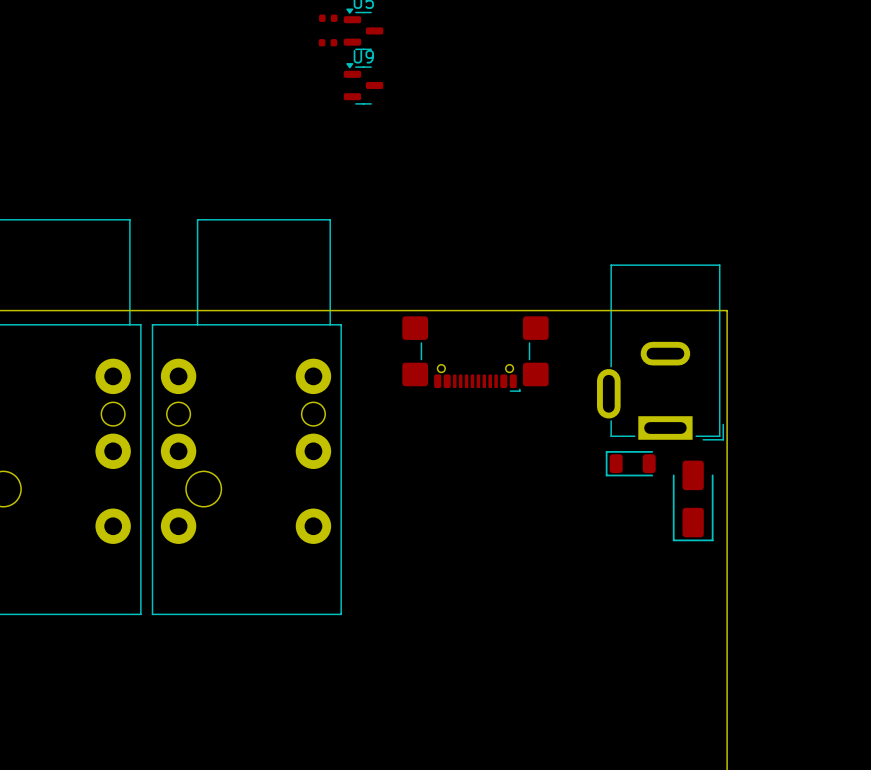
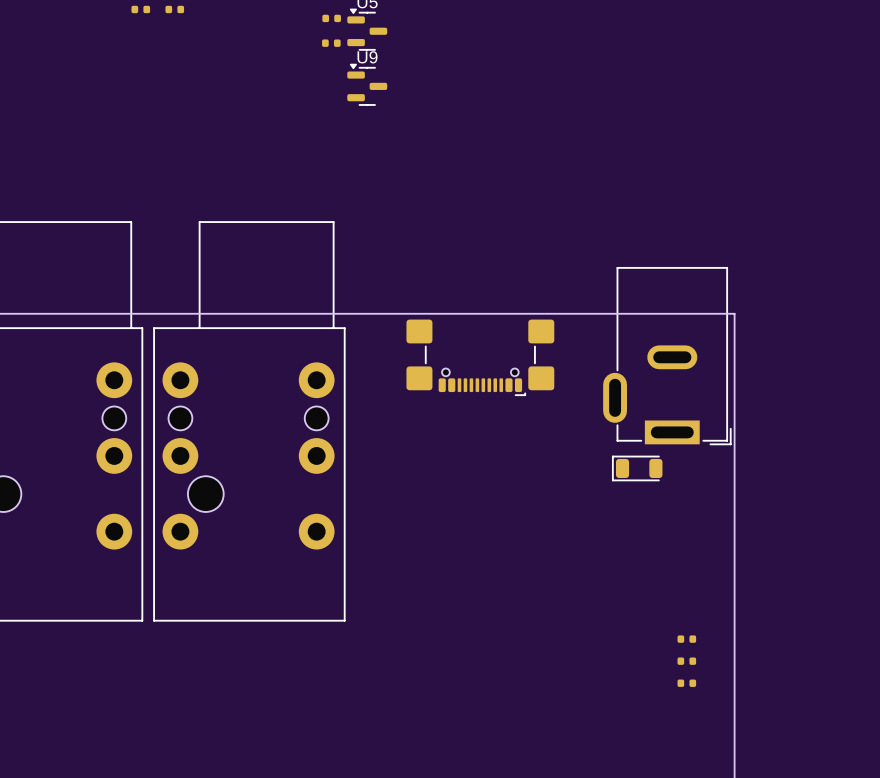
part: none -> (140, 9)
part: none -> (174, 9)
part: (693, 500) -> none
part: none -> (686, 639)
part: none -> (686, 661)
part: none -> (686, 683)

